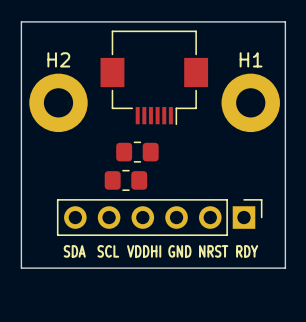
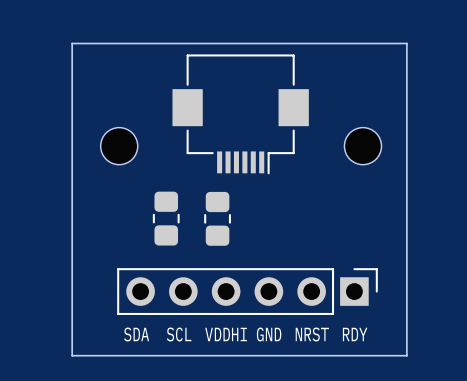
H2: (58, 102) -> none
part: none -> (119, 146)
H1: (250, 102) -> none
part: none -> (362, 146)
part rotation: 0° (137, 152) -> 90° clockwise (217, 218)
part rotation: 0° (125, 180) -> 90° clockwise (166, 218)
part position: (125, 180) -> (166, 218)

